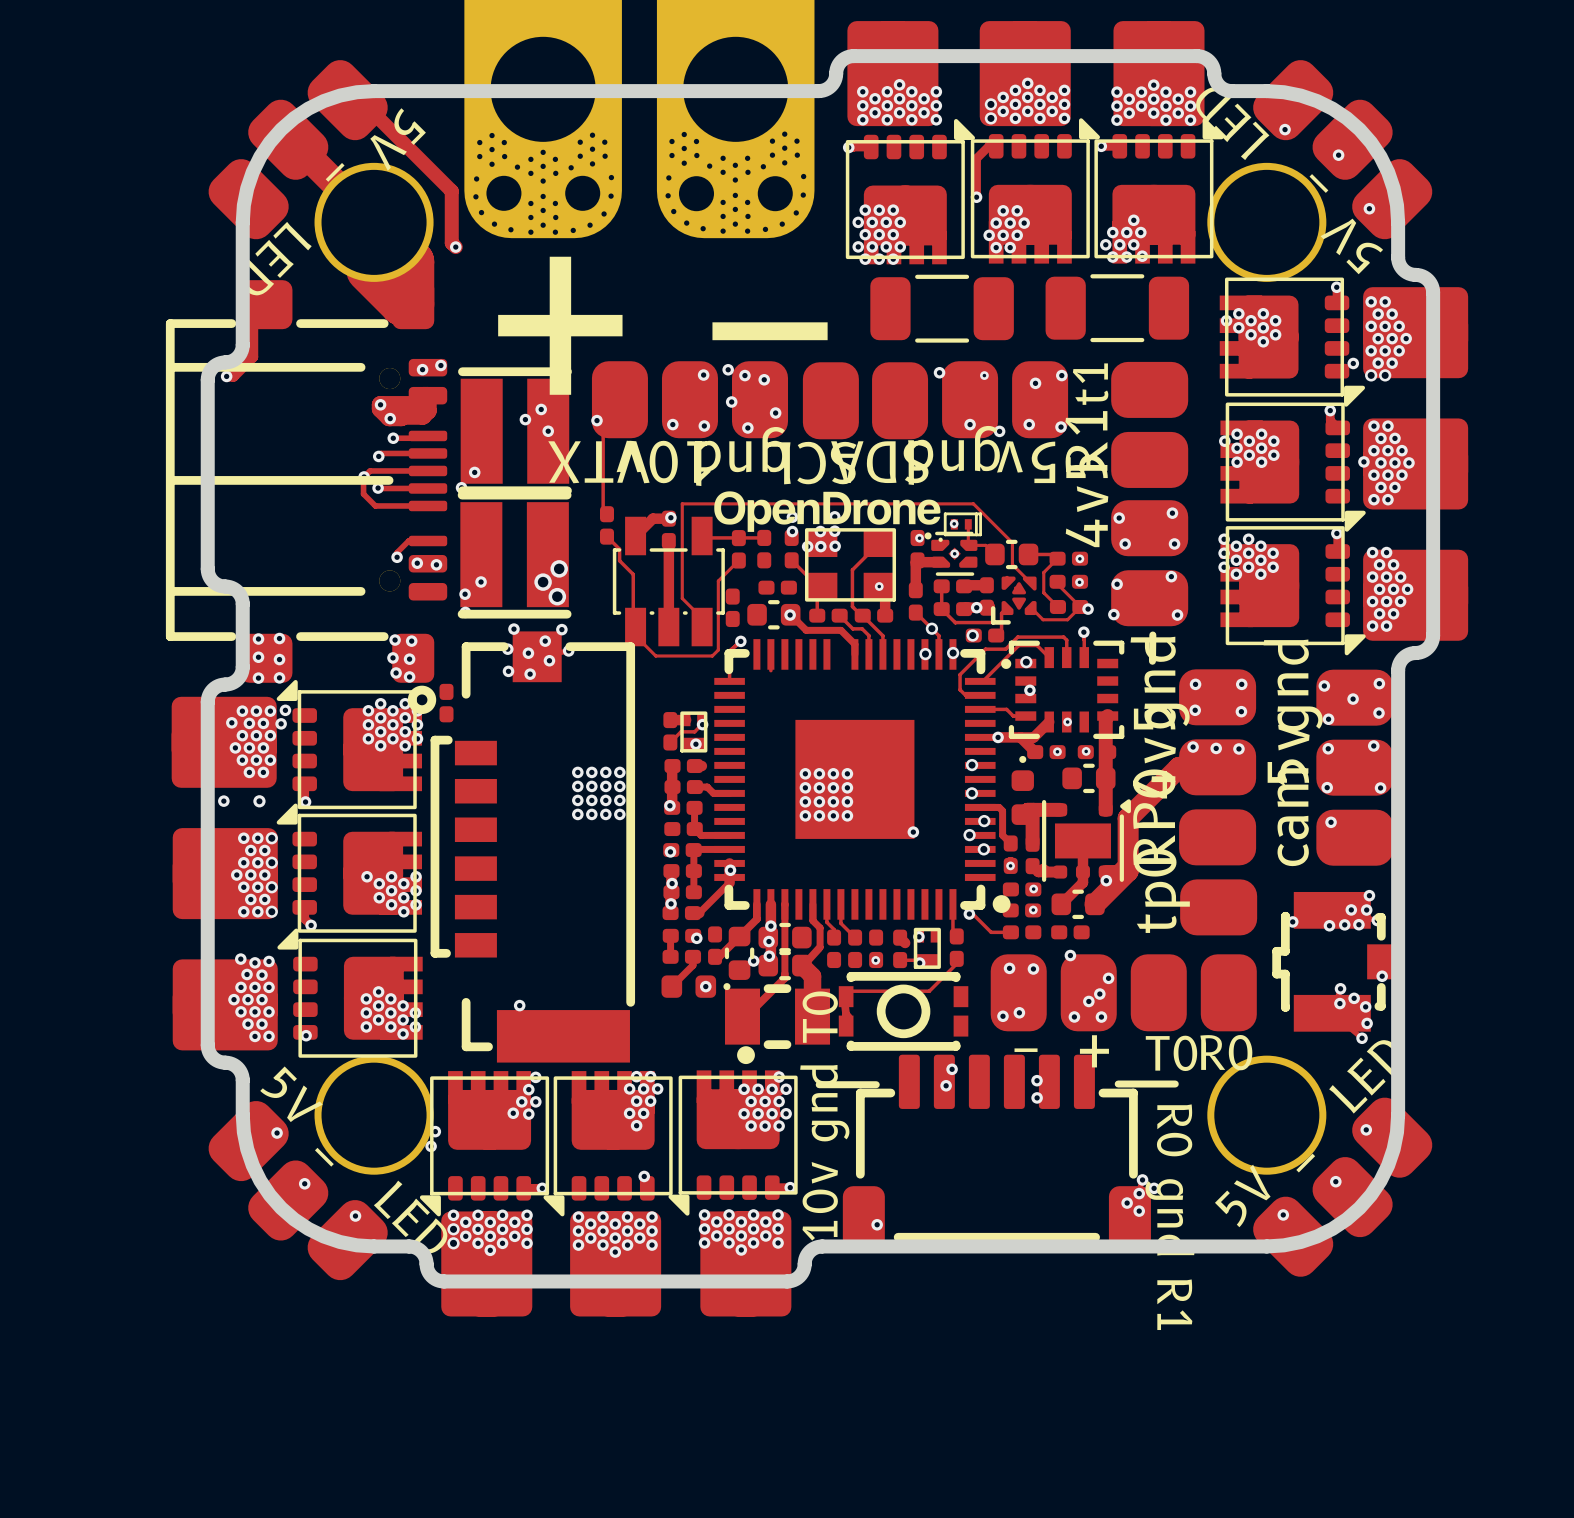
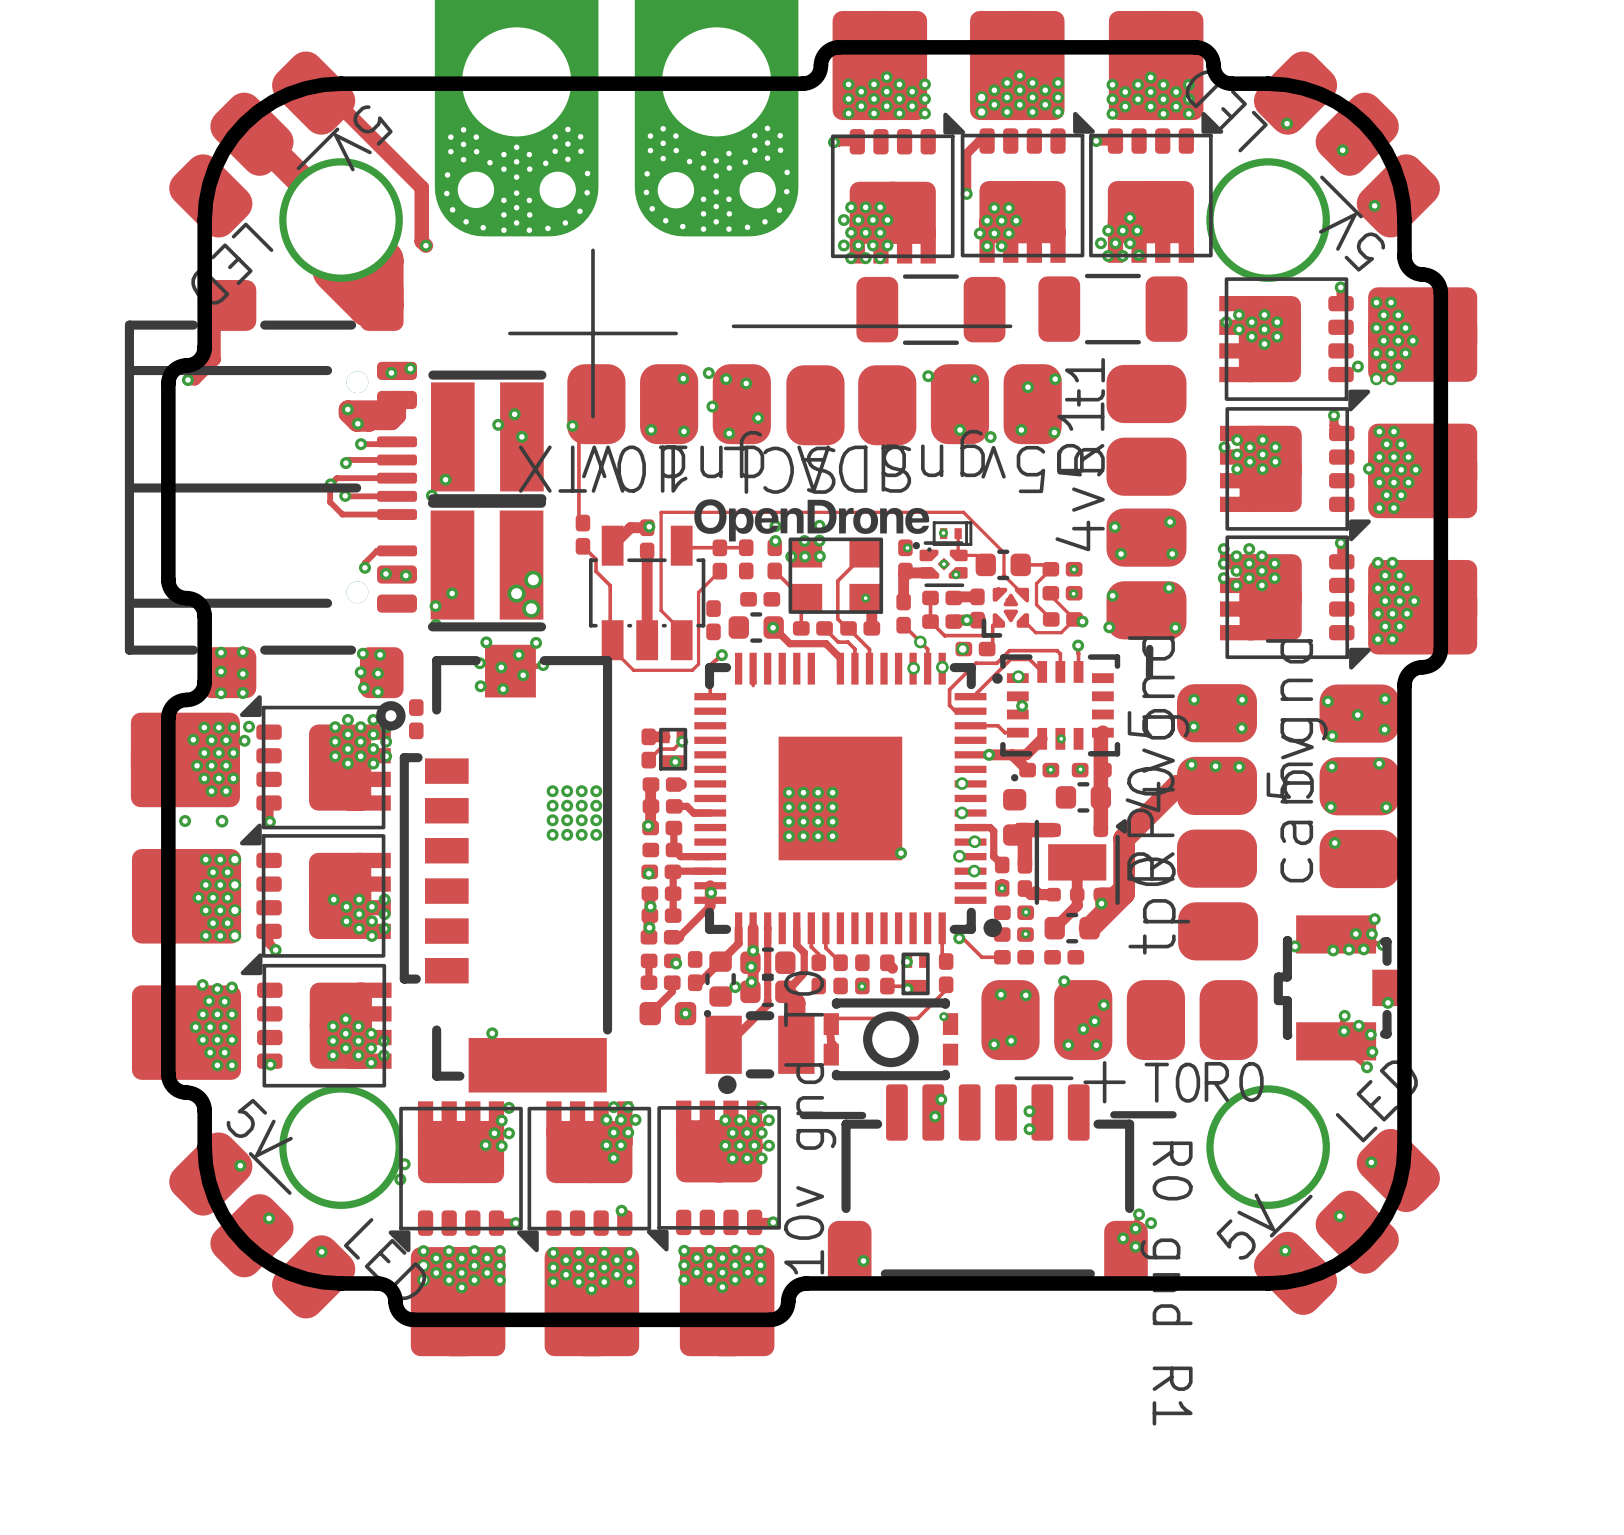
via: none -> (955, 574)
via: none -> (943, 1016)

